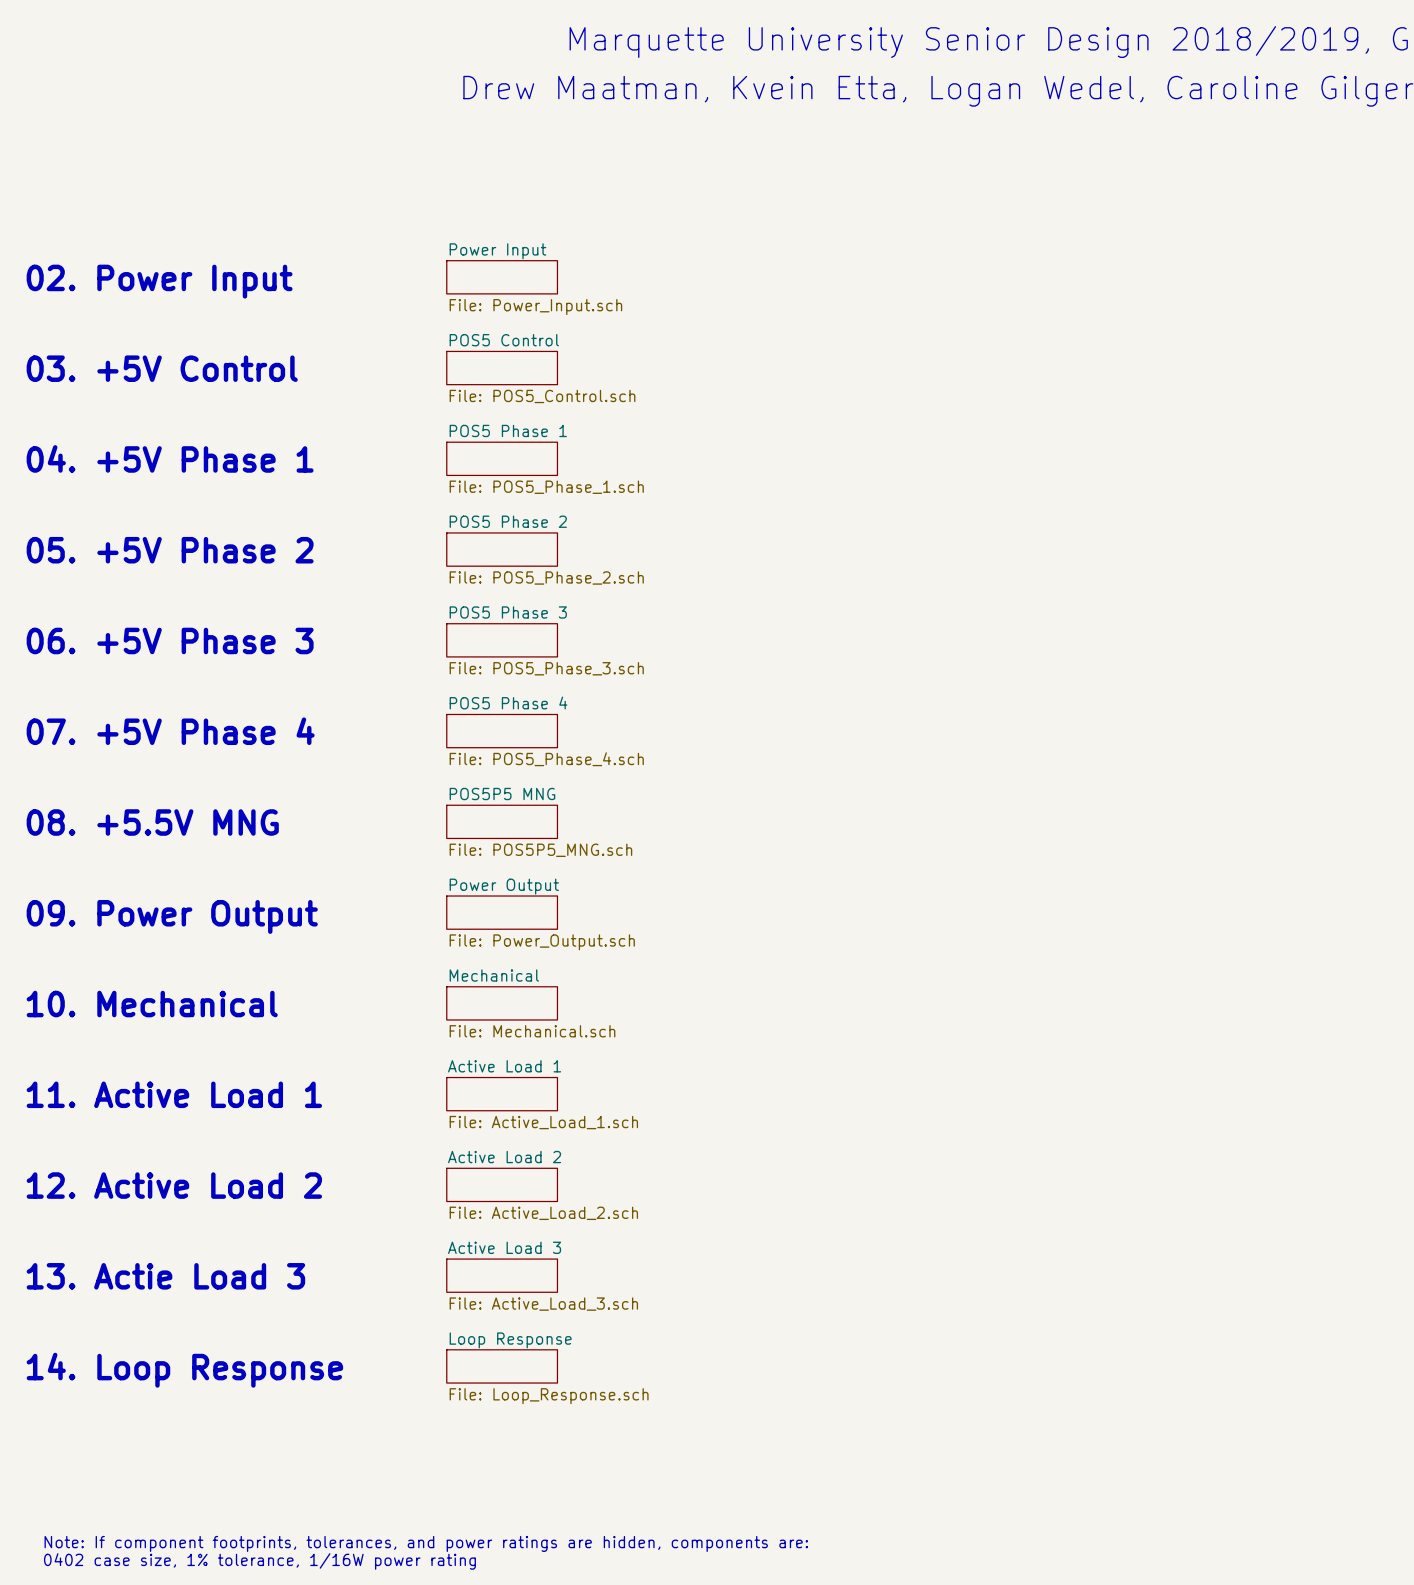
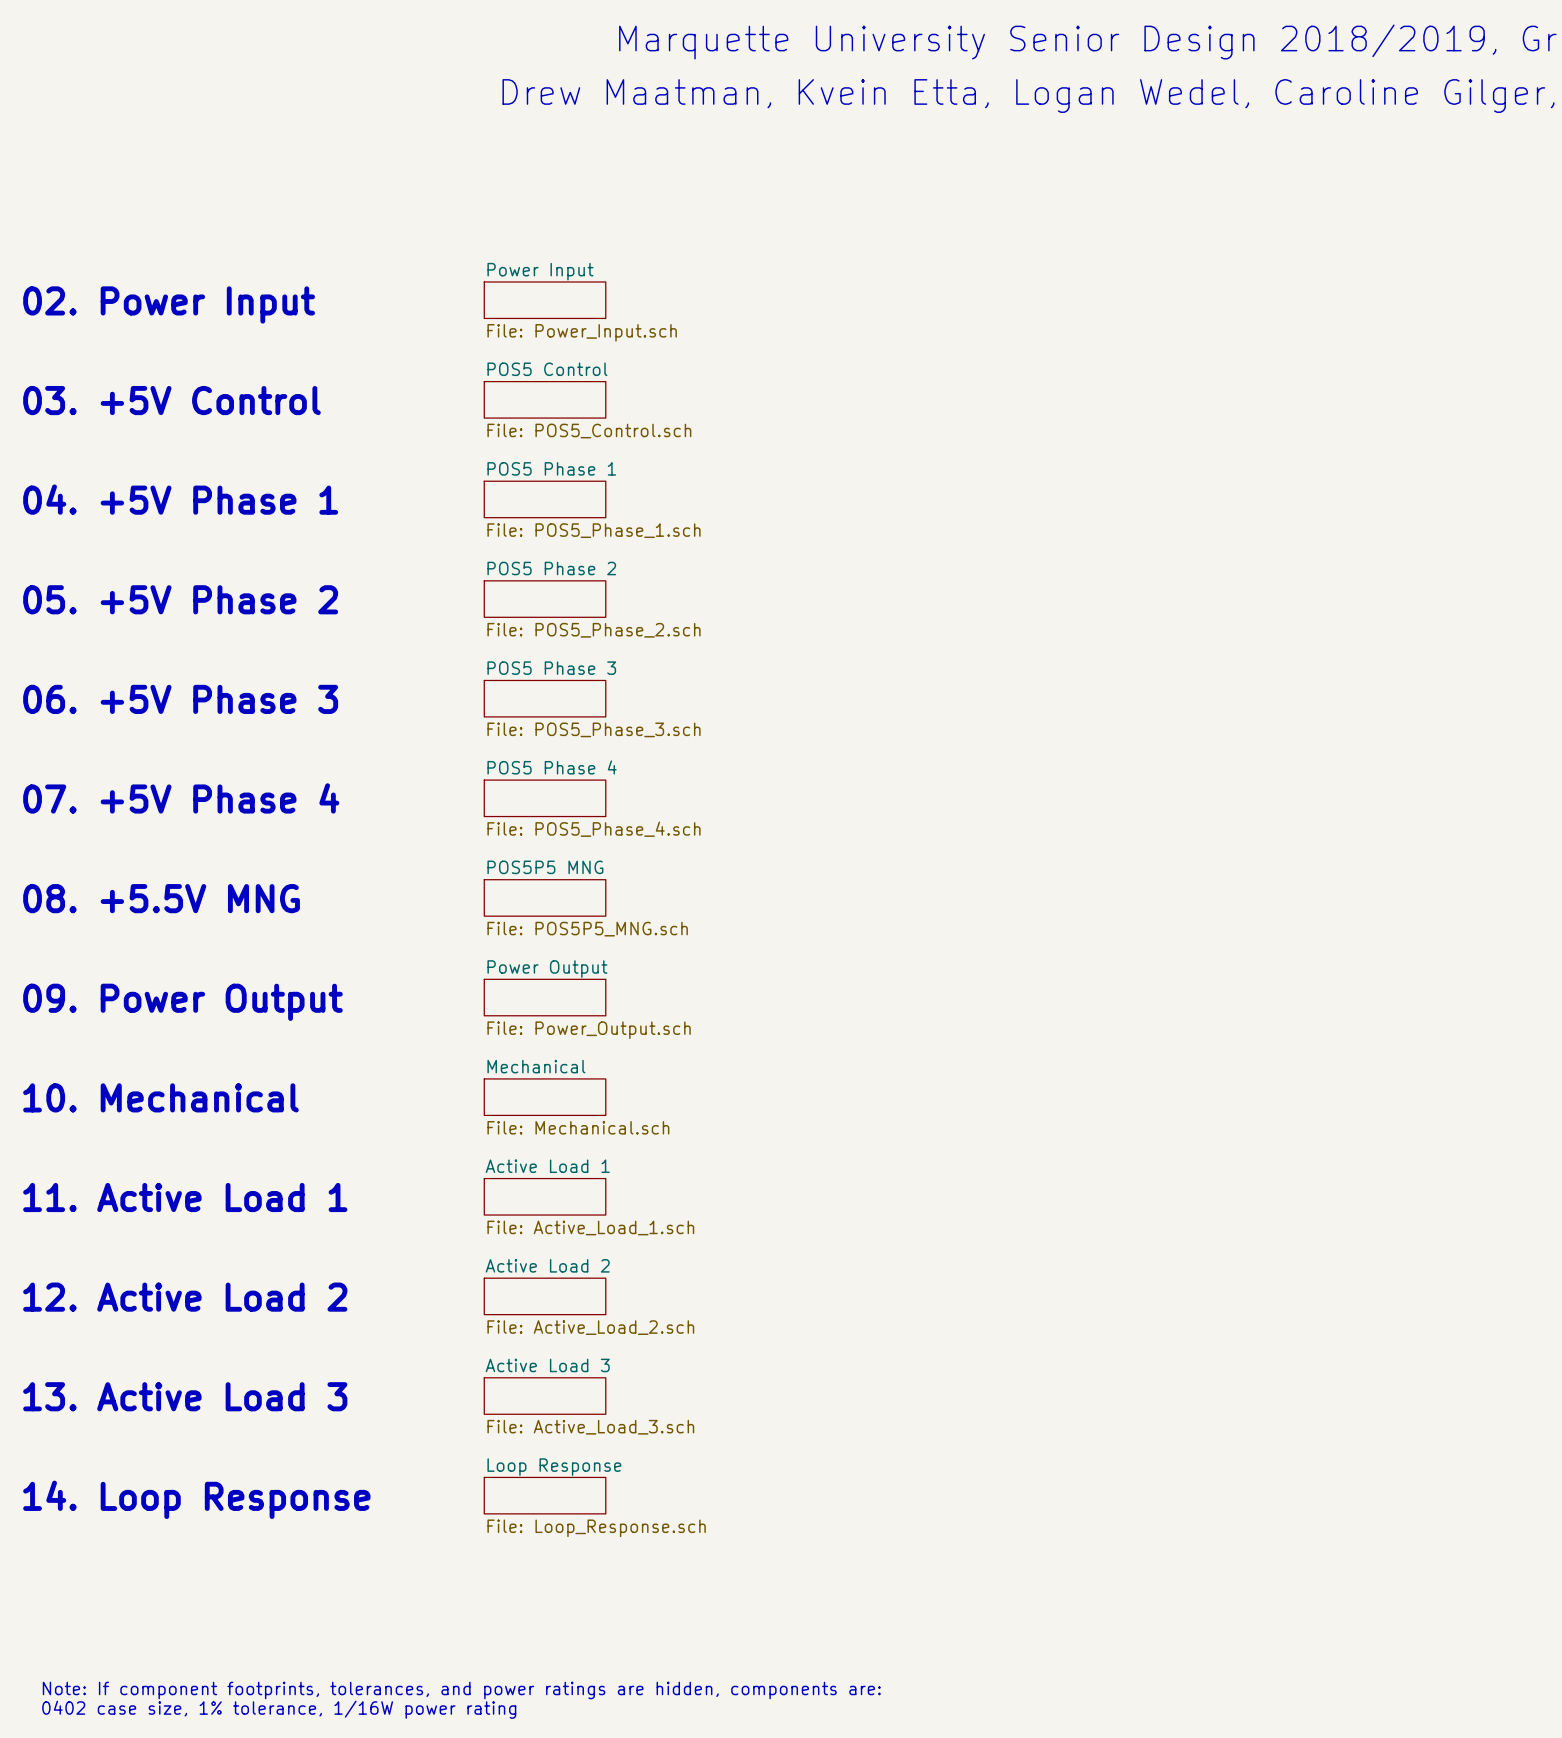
text: 13. Actie Load 3 (165, 1276) -> 13. Active Load 3 (185, 1396)

